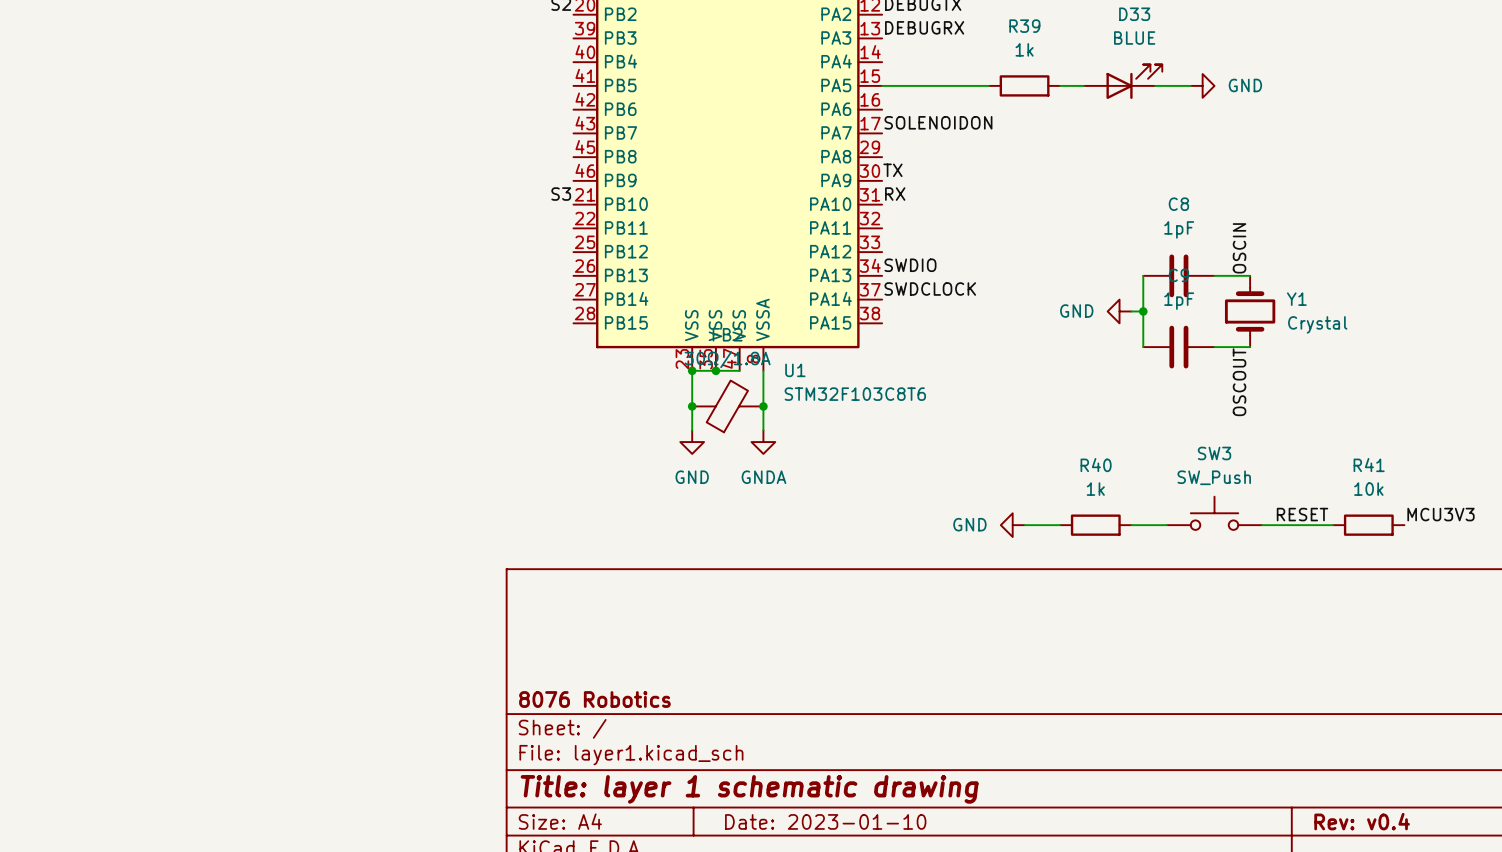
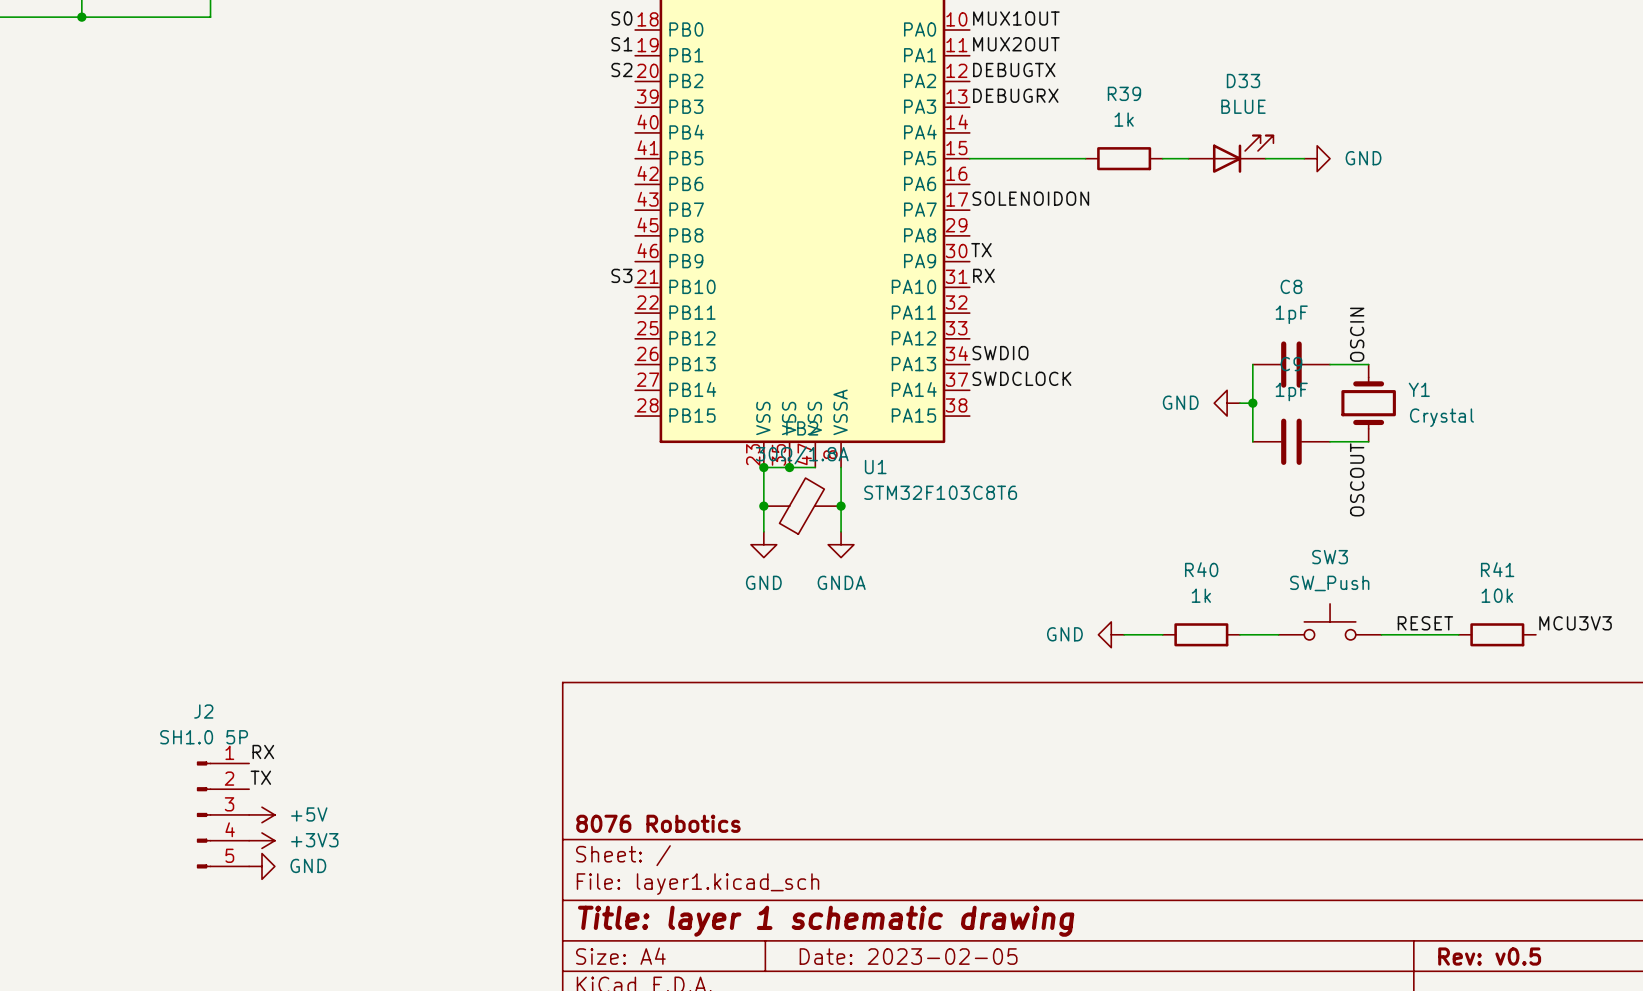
label: none -> RX (263, 751)
label: none -> TX (260, 777)
J2: none -> SH1.0 5P (223, 814)
power symbol: none -> +5V (261, 814)
power symbol: none -> +3V3 (261, 840)
power symbol: none -> GND (261, 866)
title block: Date: 2023-01-10 (825, 821) -> Date: 2023-02-05 (908, 956)
title block: Rev: v0.4 (1362, 821) -> Rev: v0.5 (1489, 956)

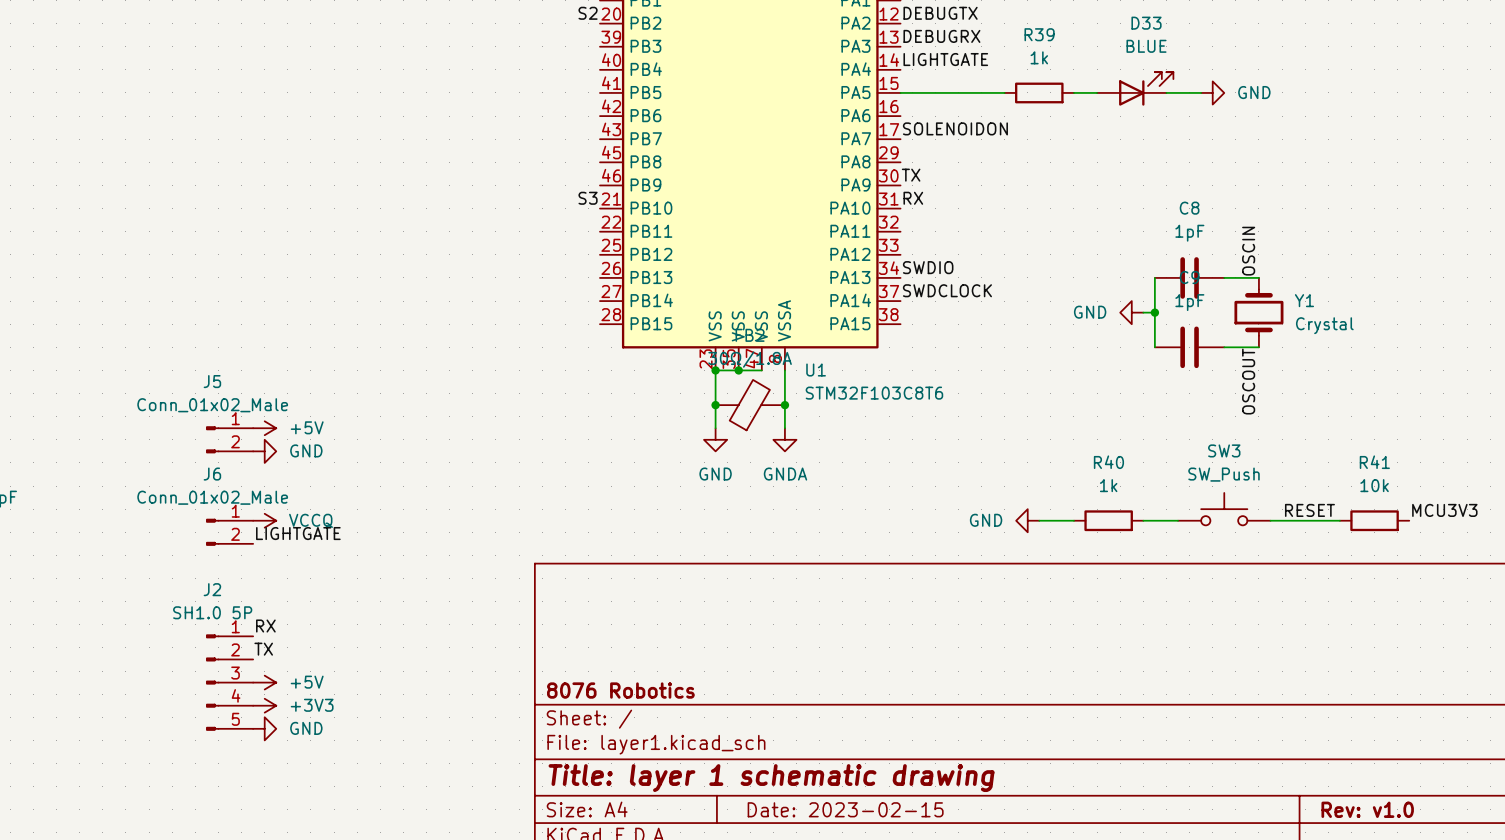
label: none -> LIGHTGATE (945, 59)
power symbol: none -> +5V (264, 428)
J5: none -> Conn_01x02_Male (229, 439)
power symbol: none -> GND (264, 451)
power symbol: none -> VCCQ (264, 520)
J6: none -> Conn_01x02_Male (229, 532)
label: none -> LIGHTGATE (298, 533)
title block: Date: 2023-02-05 (908, 956) -> Date: 2023-02-15 (845, 809)
title block: Rev: v0.5 (1489, 956) -> Rev: v1.0 (1367, 809)

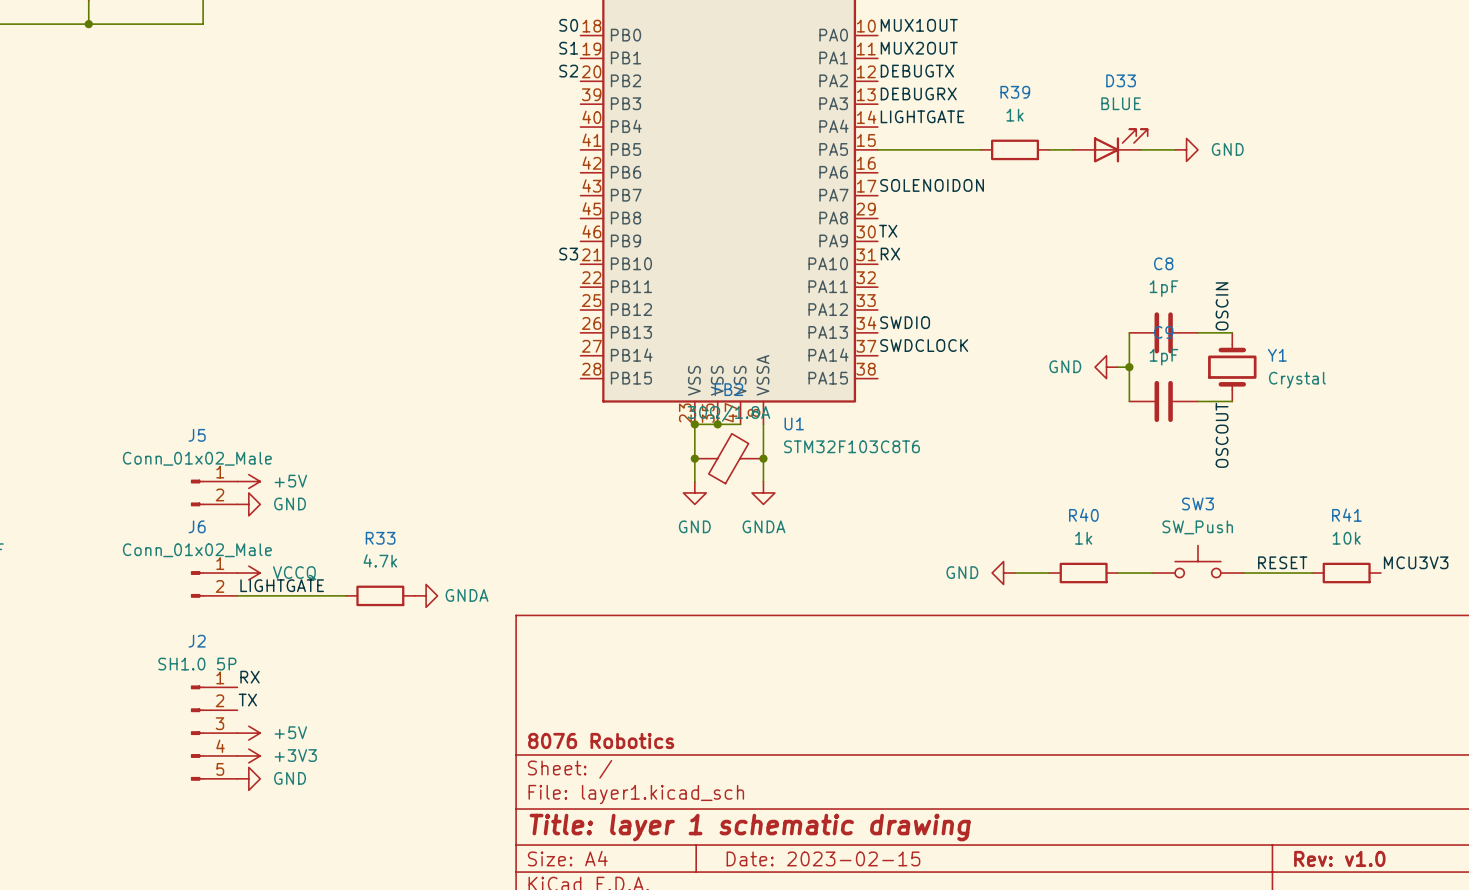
wire: none -> (237, 595) (346, 595)
R33: none -> 4.7k (380, 595)
power symbol: none -> GNDA (426, 595)

